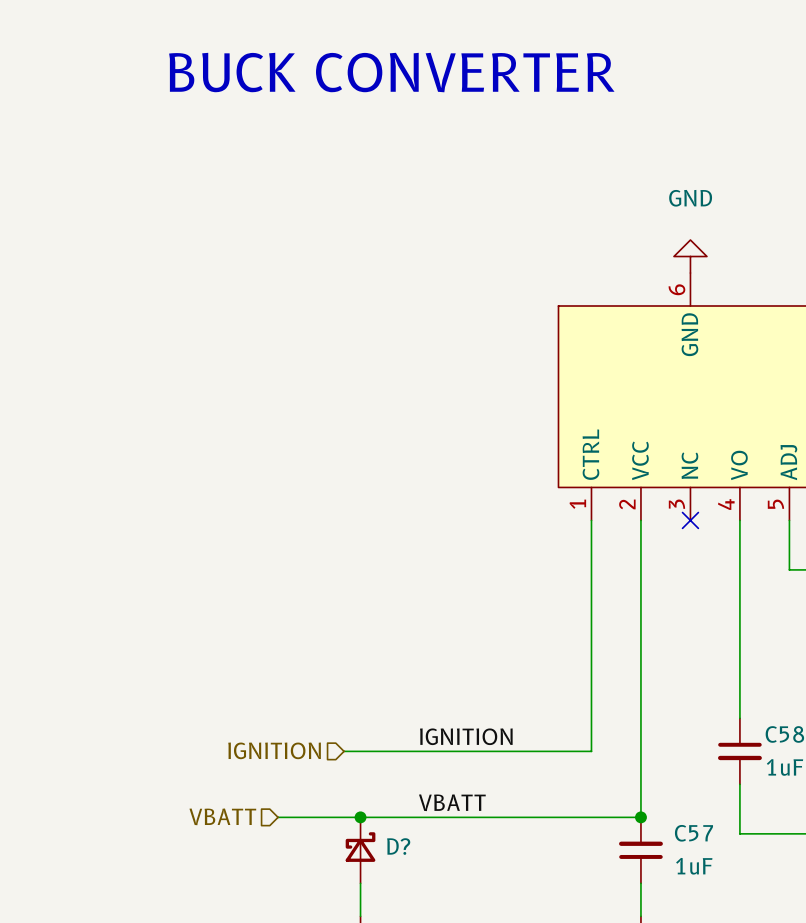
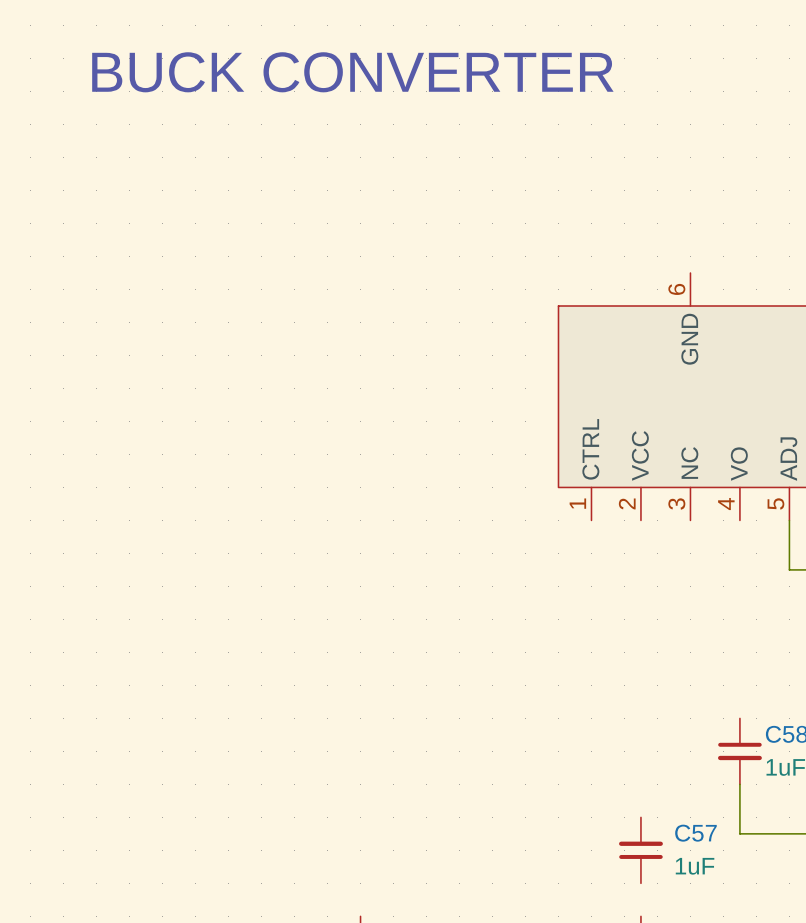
power symbol: GND (690, 256) -> none
wire: (591, 520) (591, 751) (344, 751) -> none
wire: (640, 520) (640, 817) (278, 817) -> none
no-connect mark: (690, 520) -> none
wire: (739, 520) (739, 718) -> none
label: IGNITION (466, 736) -> none
hierarchical label: IGNITION (274, 750) -> none
label: VBATT (452, 802) -> none
hierarchical label: VBATT (222, 816) -> none
junction: (360, 817) -> none
junction: (640, 817) -> none
D?: (360, 850) -> none
wire: (360, 883) (360, 916) -> none
wire: (640, 883) (640, 916) -> none

